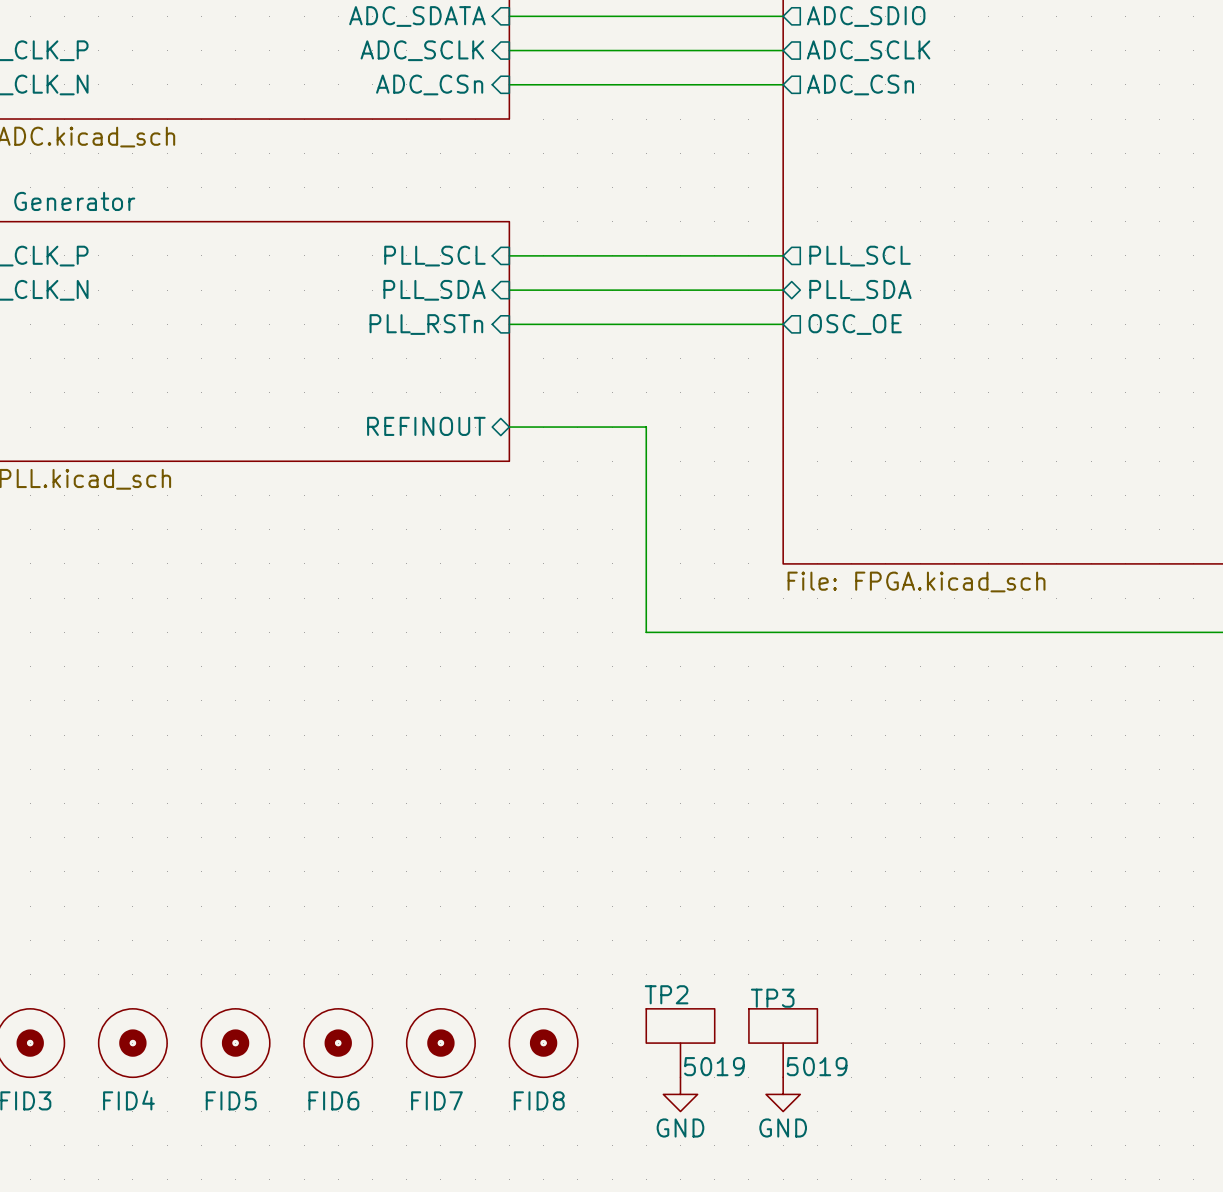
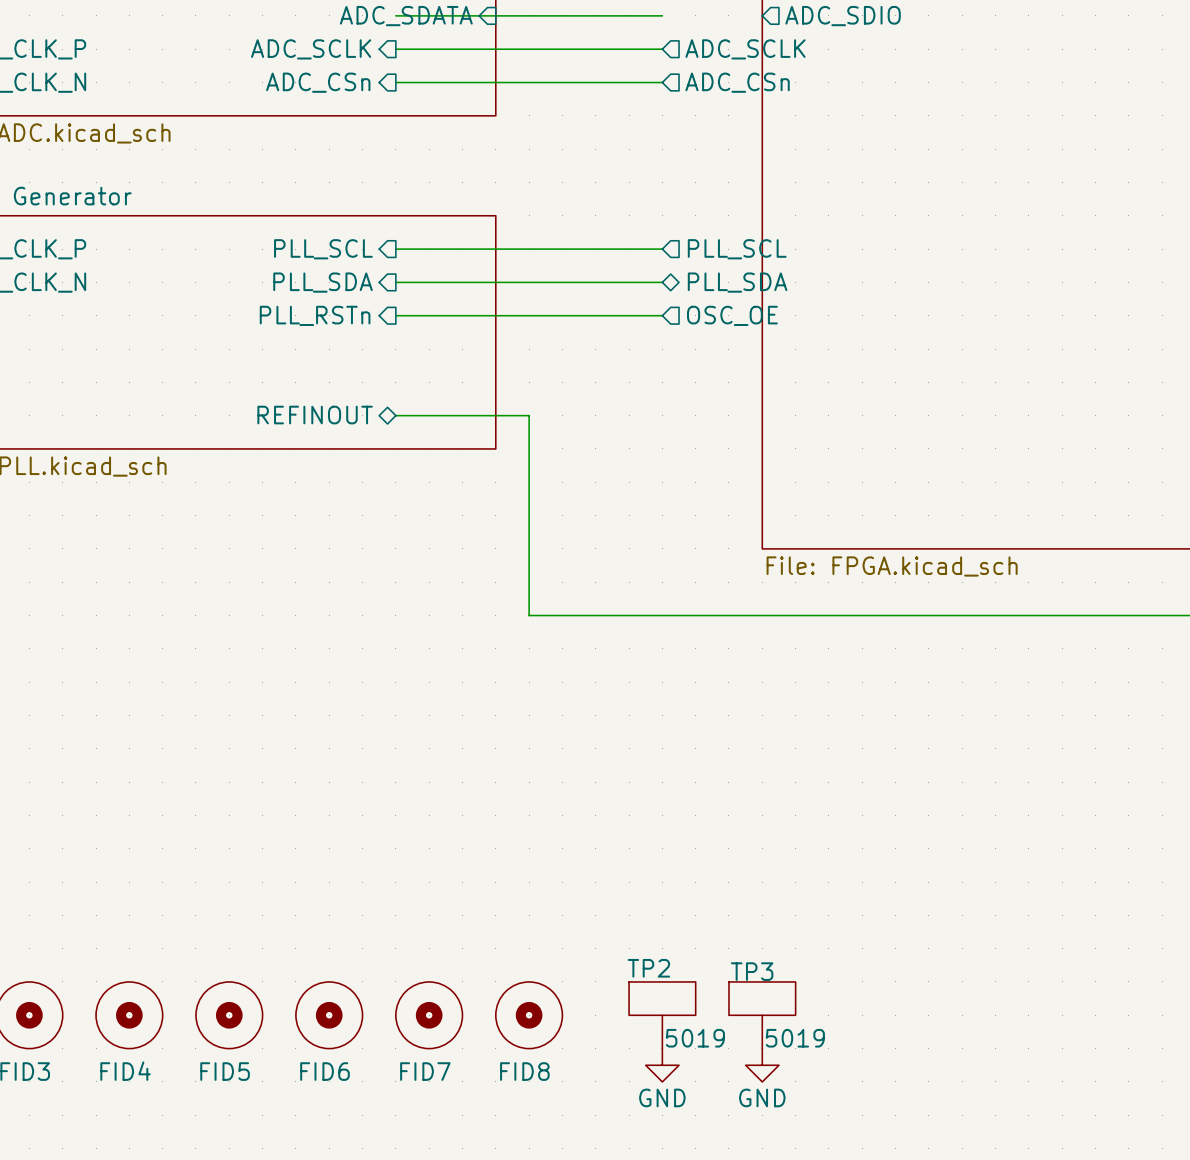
wire: (680, 16) (783, 16) -> (395, 15) (495, 15)
sheet pin position: ADC_SCLK (422, 50) -> ADC_SCLK (311, 49)
wire: (680, 50) (783, 50) -> (395, 49) (495, 49)
sheet pin position: ADC_SCLK (868, 50) -> ADC_SCLK (745, 49)
sheet pin position: ADC_CSn (429, 84) -> ADC_CSn (318, 82)
wire: (680, 84) (783, 84) -> (395, 82) (495, 82)
sheet pin position: ADC_CSn (860, 84) -> ADC_CSn (737, 82)
wire: (680, 255) (783, 255) -> (395, 249) (495, 249)
sheet pin position: PLL_SCL (434, 256) -> PLL_SCL (323, 249)
sheet pin position: PLL_SCL (860, 256) -> PLL_SCL (737, 249)
sheet pin position: PLL_SDA (434, 290) -> PLL_SDA (323, 282)
wire: (680, 290) (783, 290) -> (395, 282) (495, 282)
sheet pin position: PLL_SDA (860, 290) -> PLL_SDA (737, 282)
sheet pin position: PLL_RSTn (426, 324) -> PLL_RSTn (315, 315)
wire: (680, 324) (783, 324) -> (395, 315) (495, 315)
sheet pin position: OSC_OE (855, 324) -> OSC_OE (732, 315)
sheet pin position: REFINOUT (426, 426) -> REFINOUT (315, 415)
wire: none -> (395, 415) (495, 415)
wire: (543, 427) (646, 427) (646, 632) -> (529, 415) (529, 615) (629, 615)

